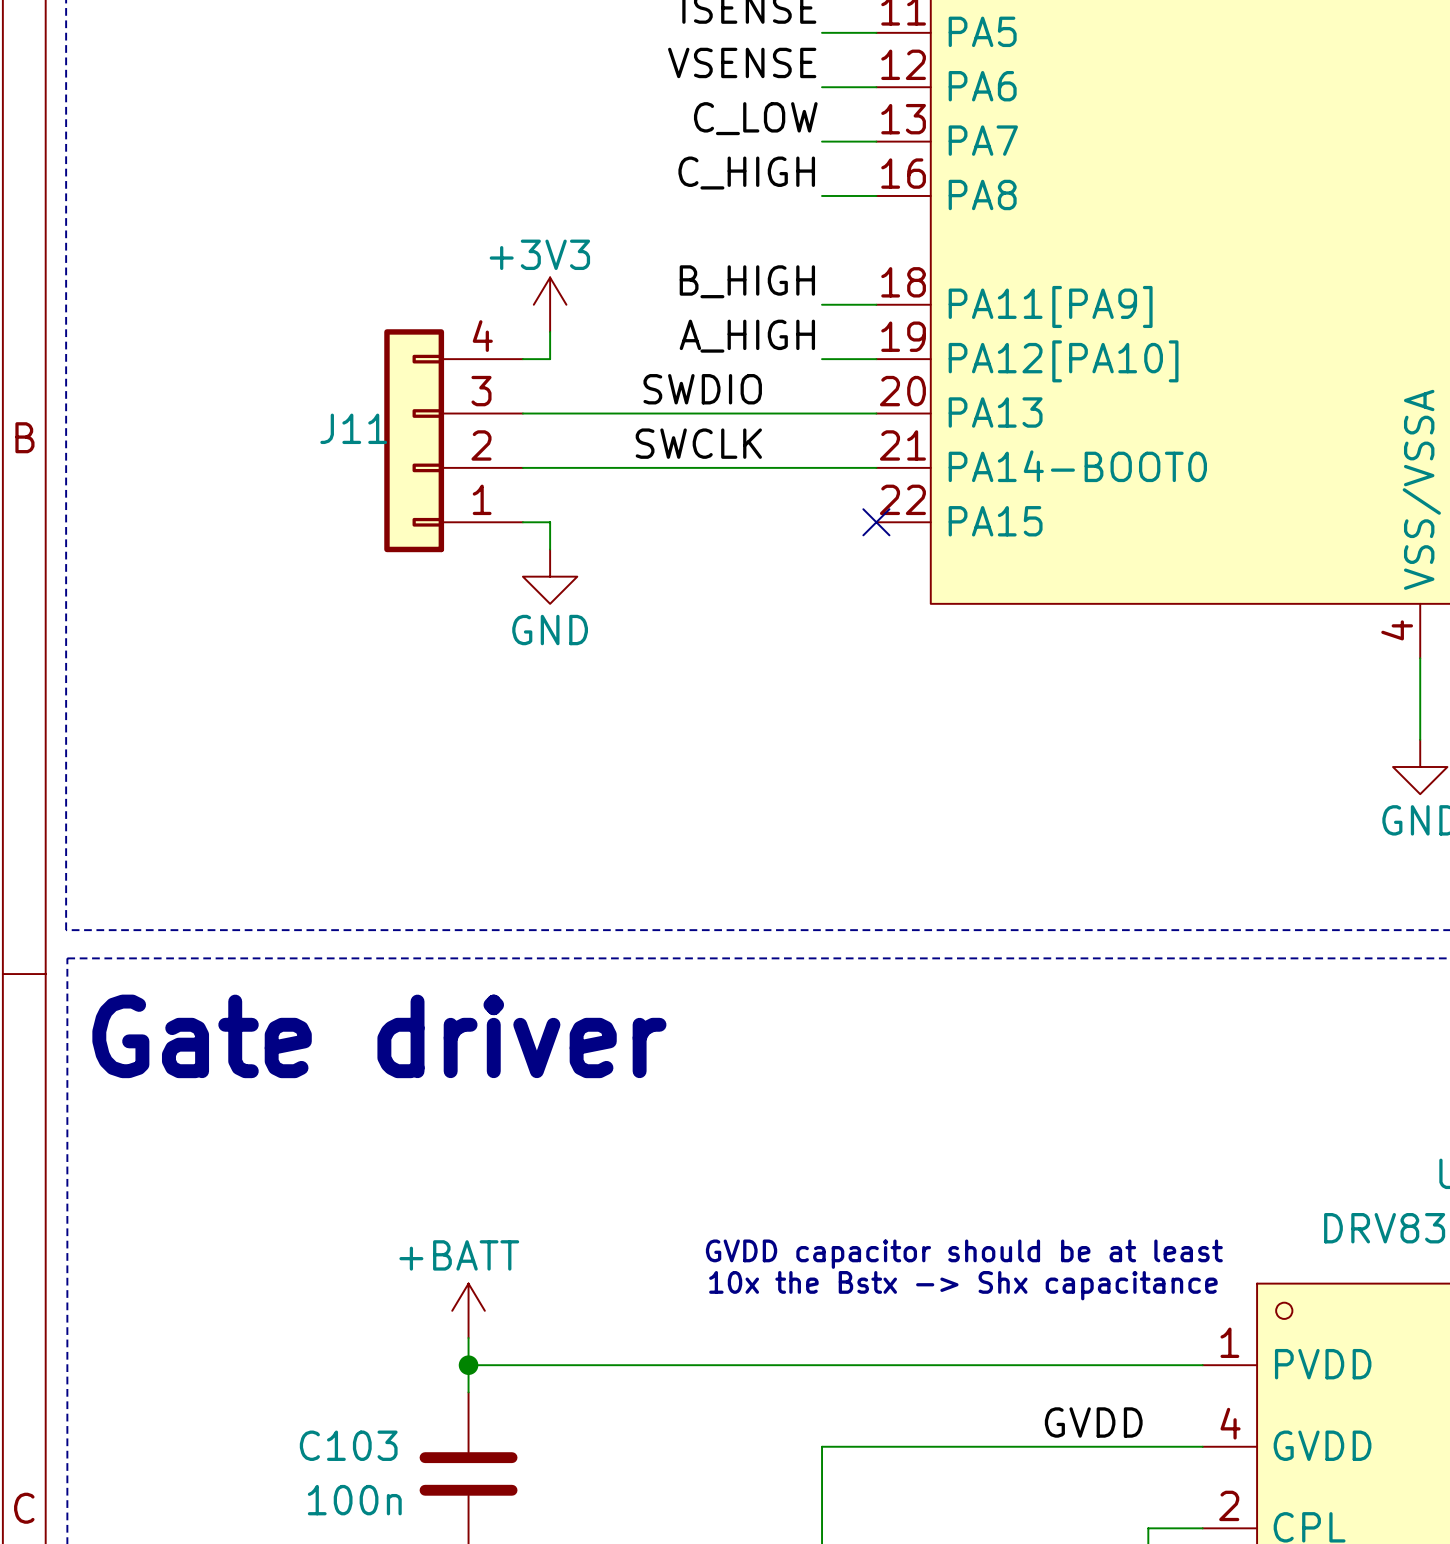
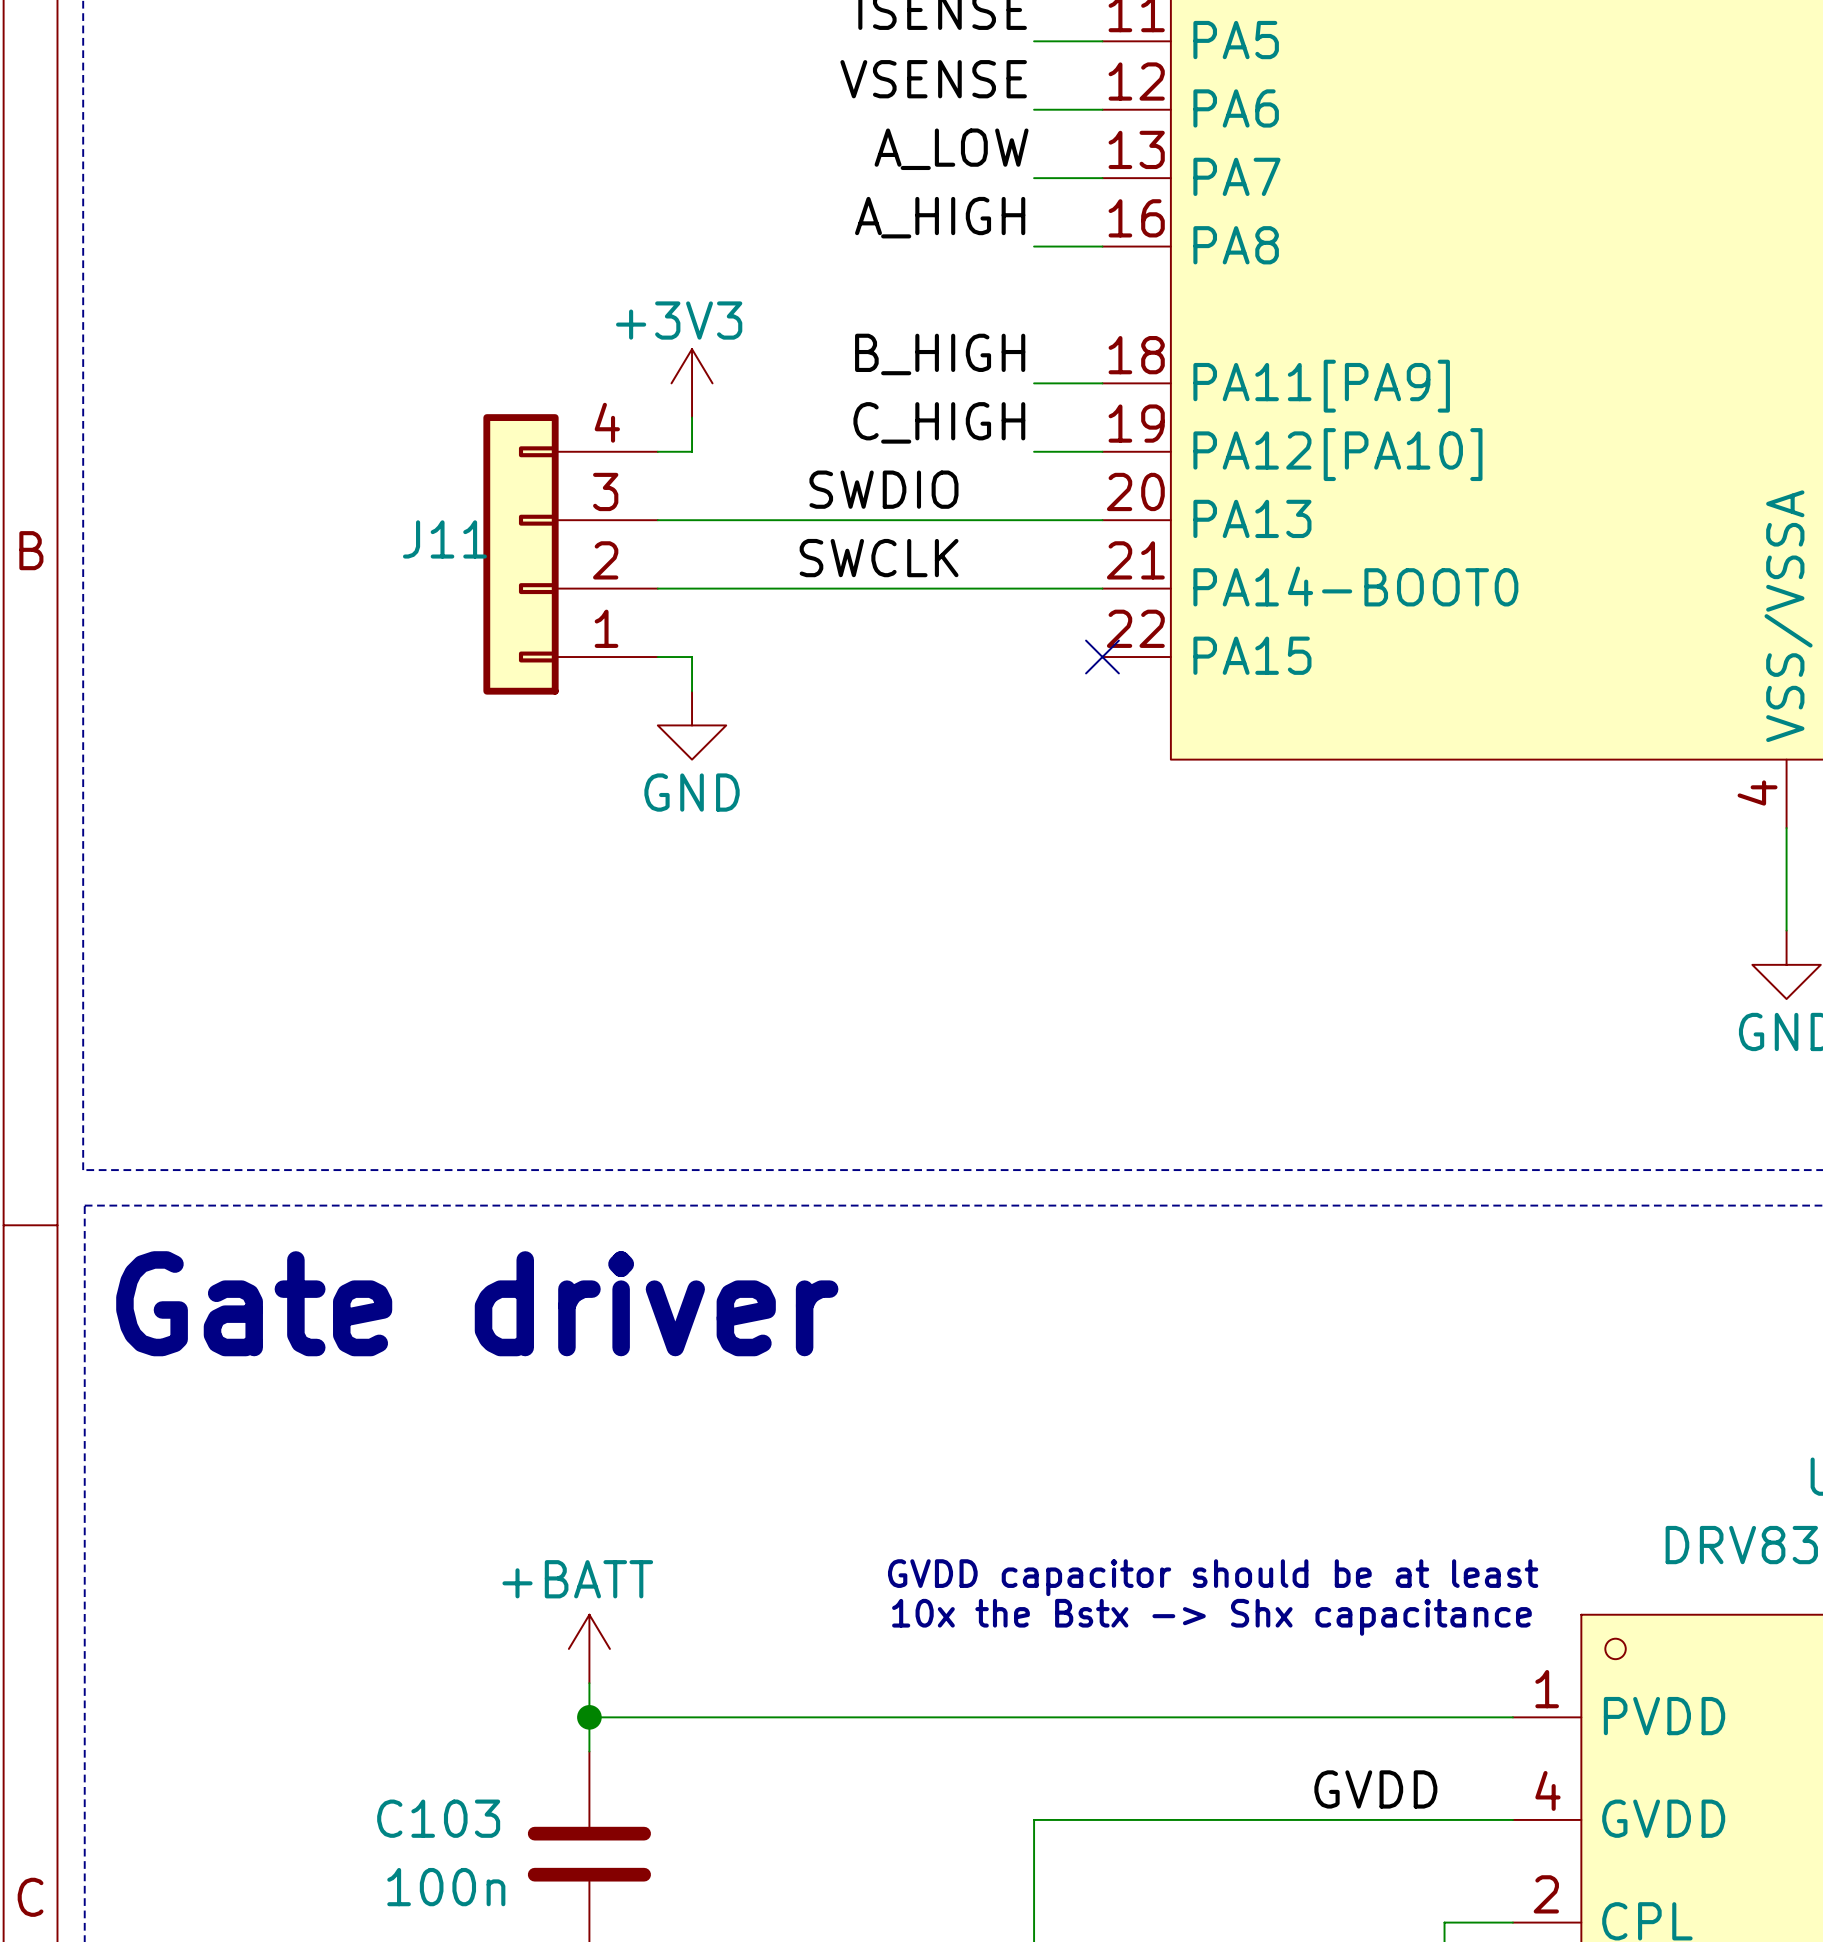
label: C_LOW (755, 118) -> A_LOW (951, 149)
label: C_HIGH (746, 173) -> A_HIGH (940, 217)
label: A_HIGH (747, 336) -> C_HIGH (939, 422)

